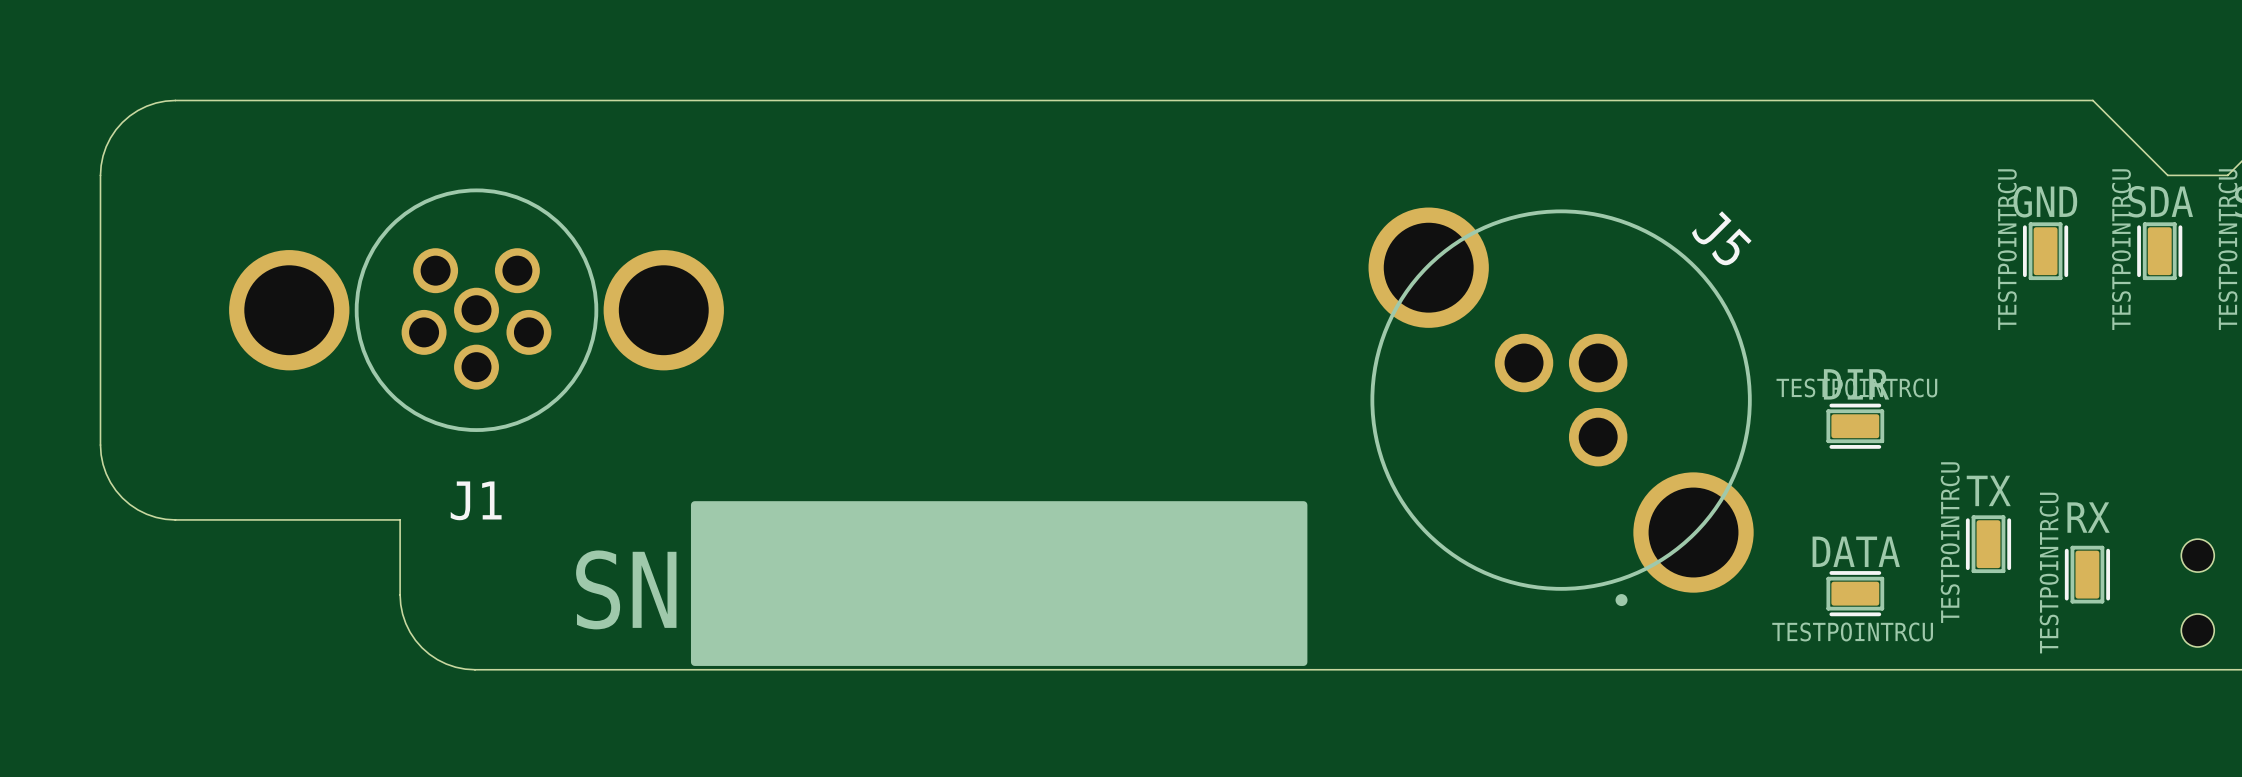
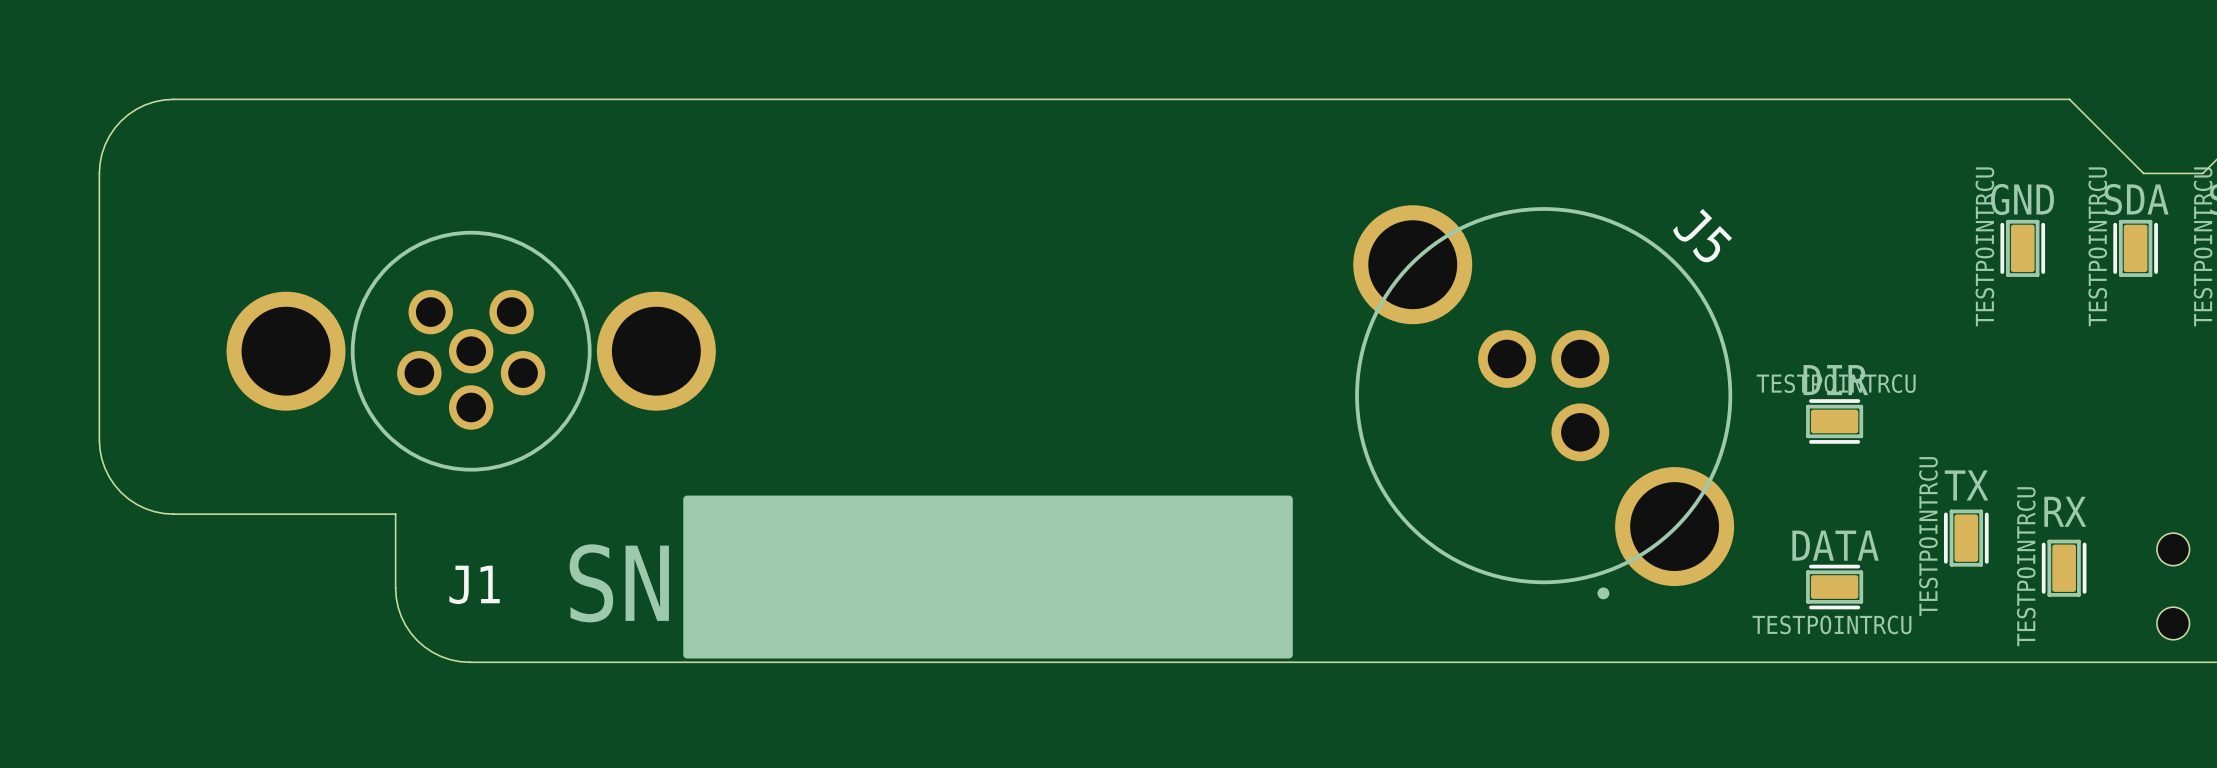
J1 position: (476, 310) -> (471, 351)
J1 name position: J1 (476, 500) -> J1 (474, 584)

